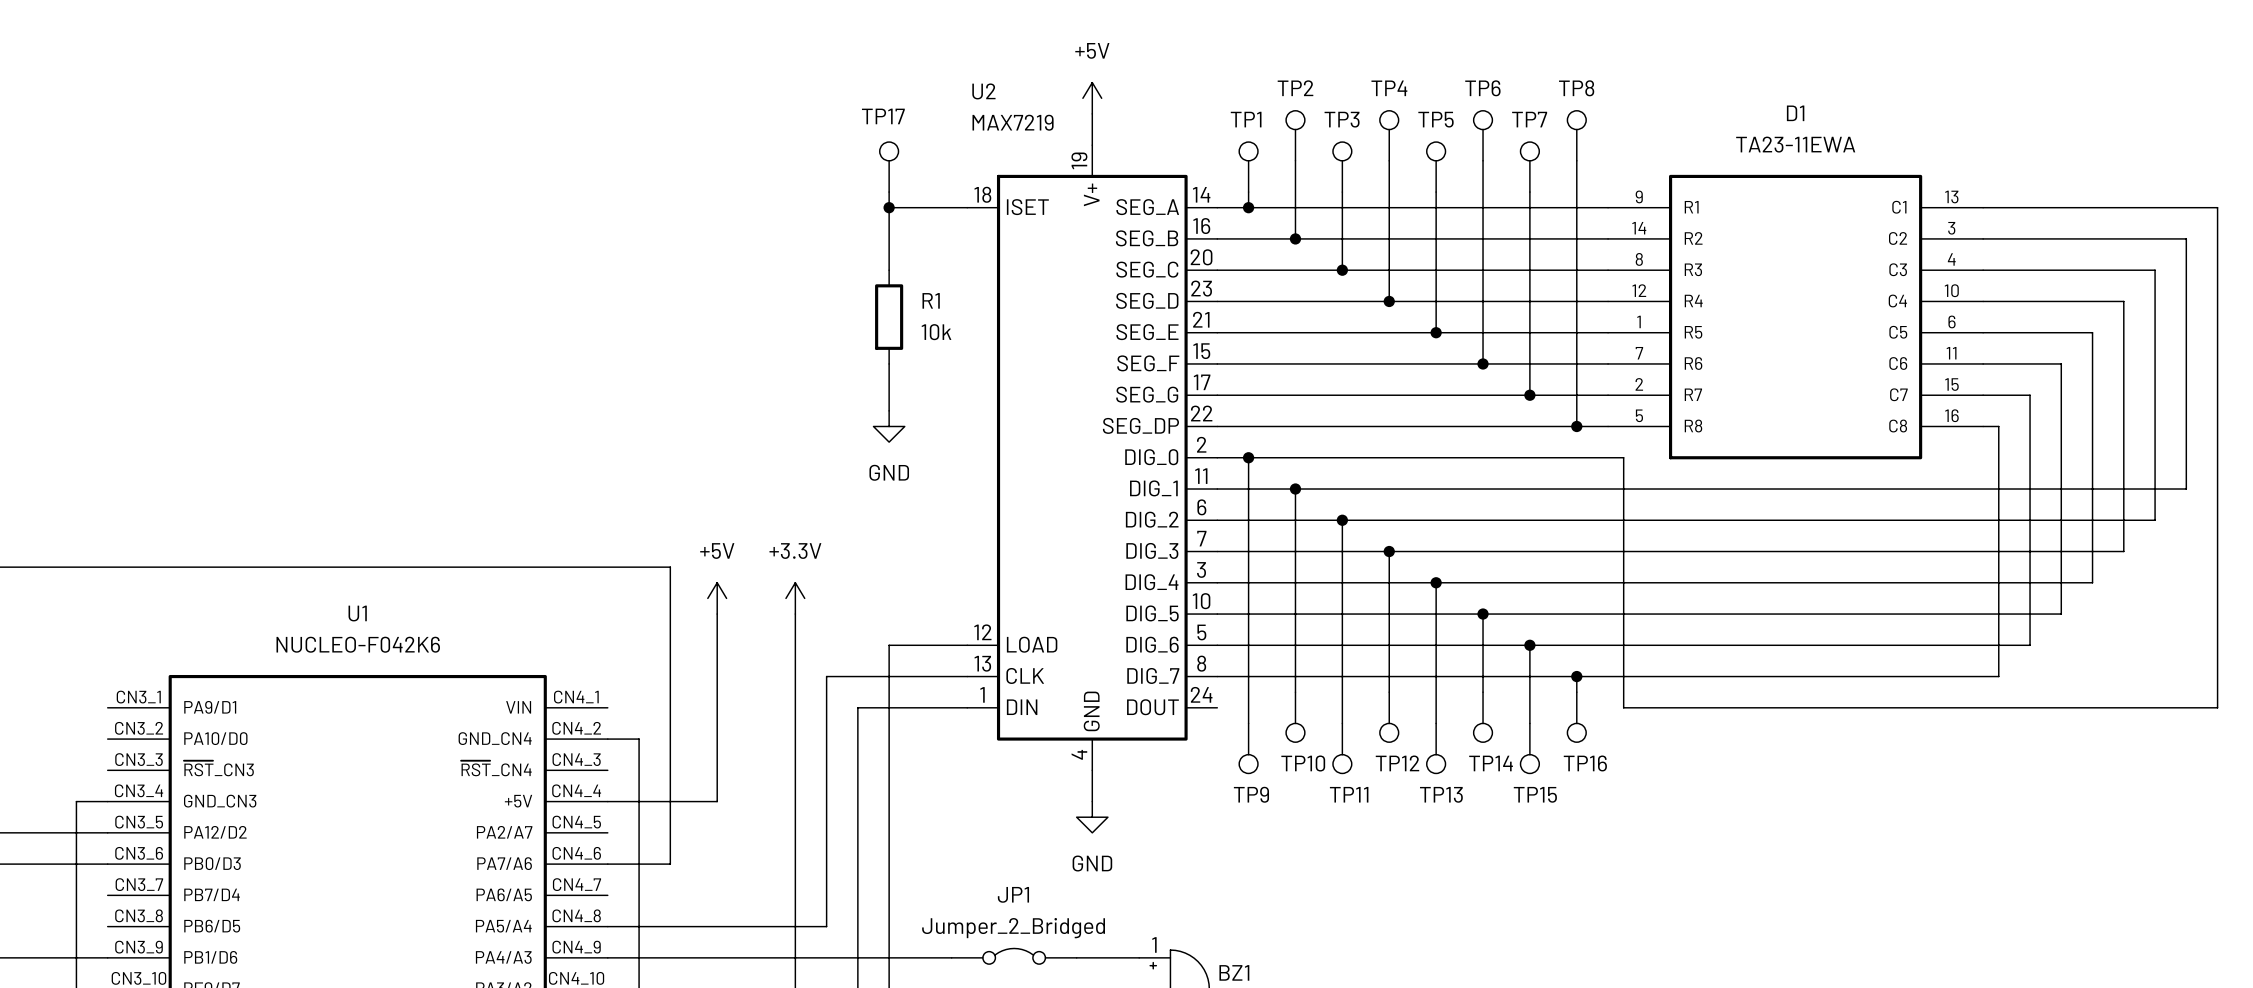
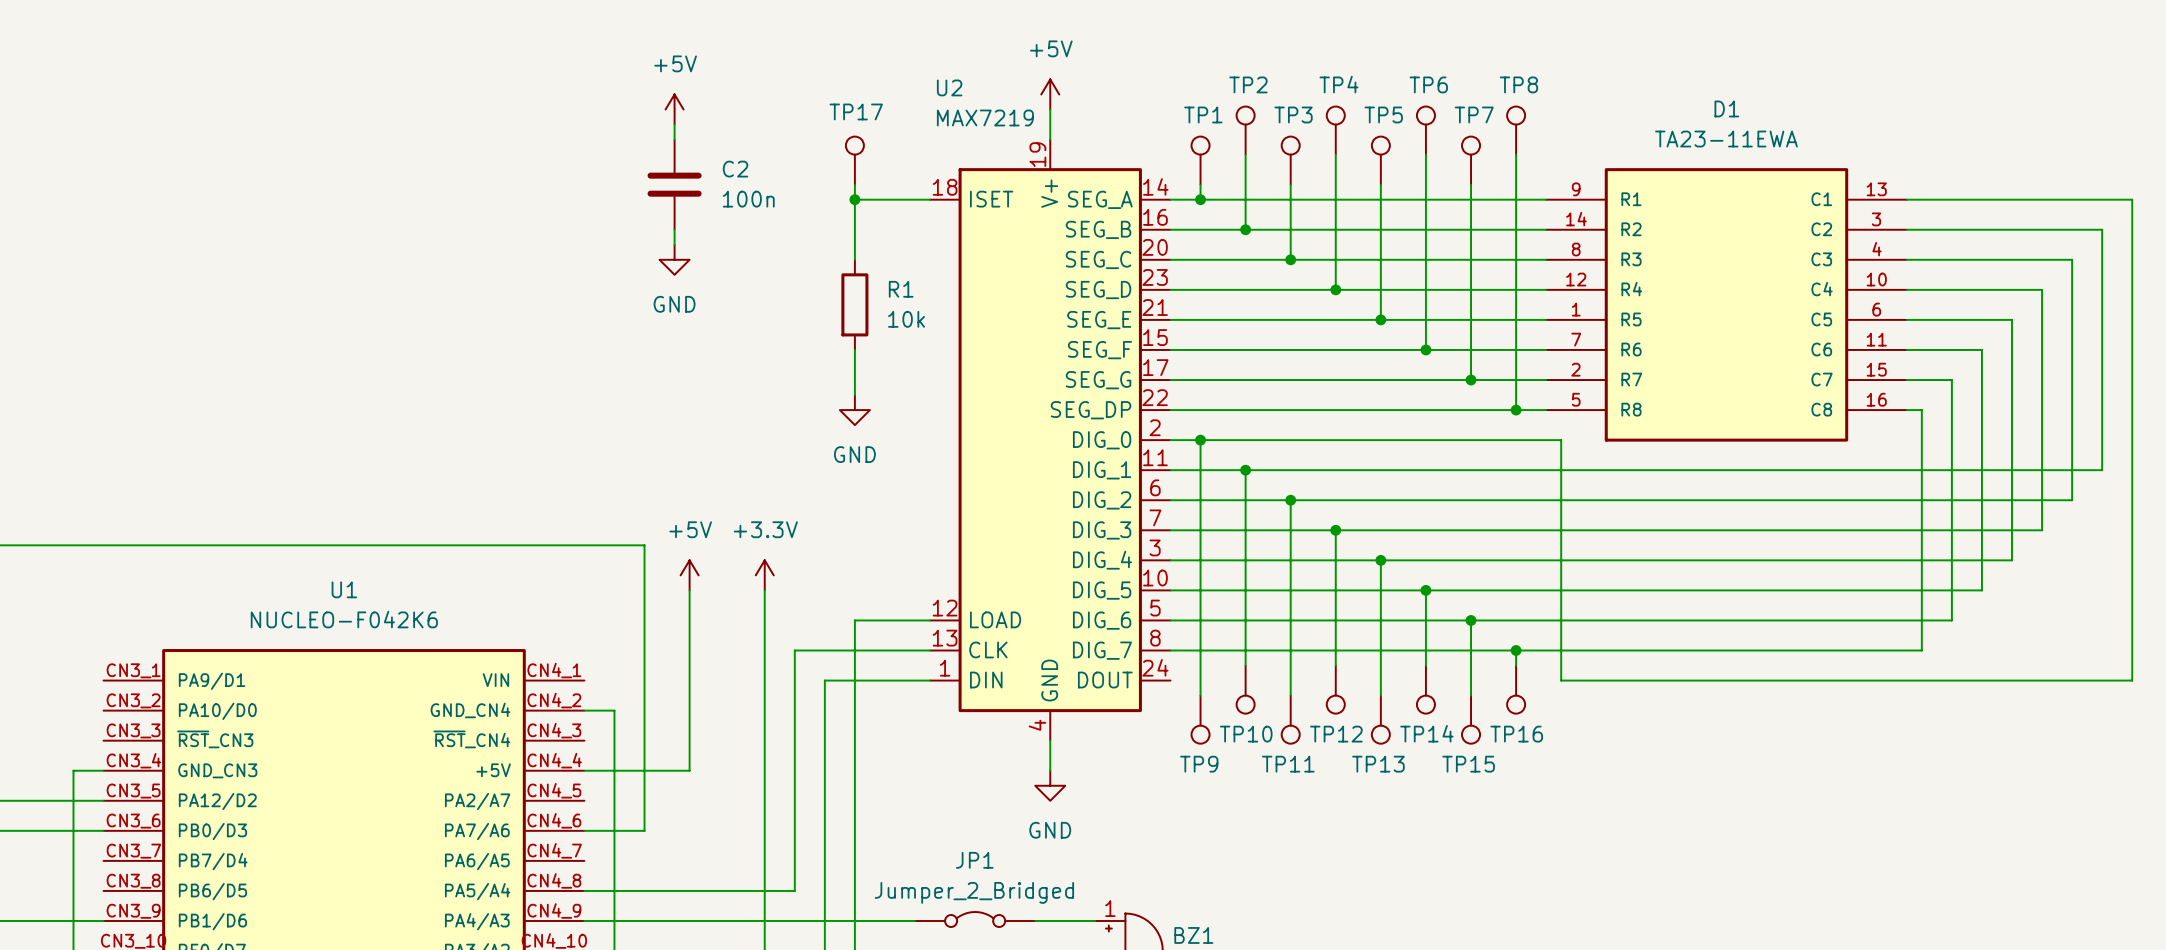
power symbol: none -> +5V (674, 109)
wire: none -> (674, 124) (674, 139)
C2: none -> 100n (674, 184)
wire: none -> (674, 229) (674, 244)
power symbol: none -> GND (674, 259)

